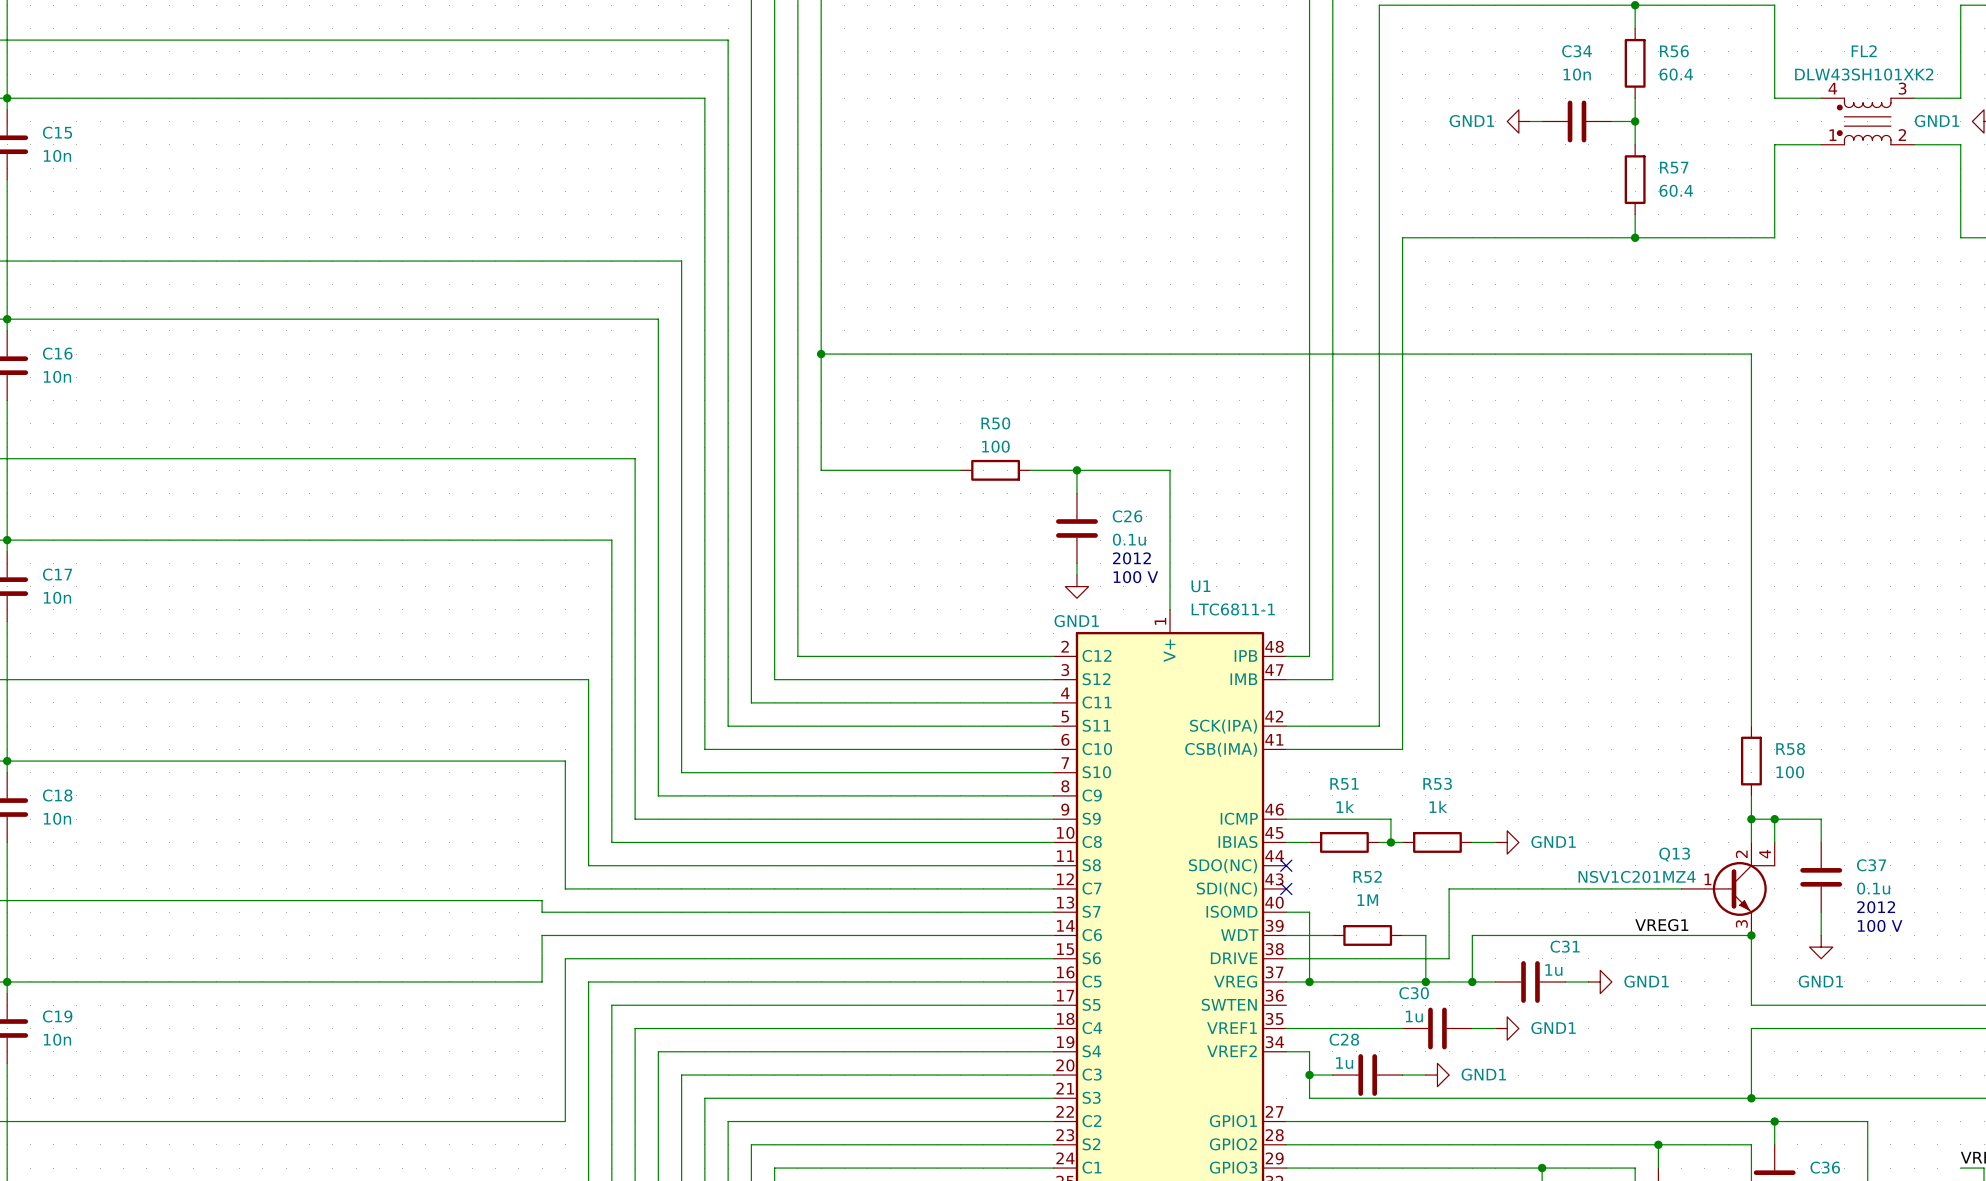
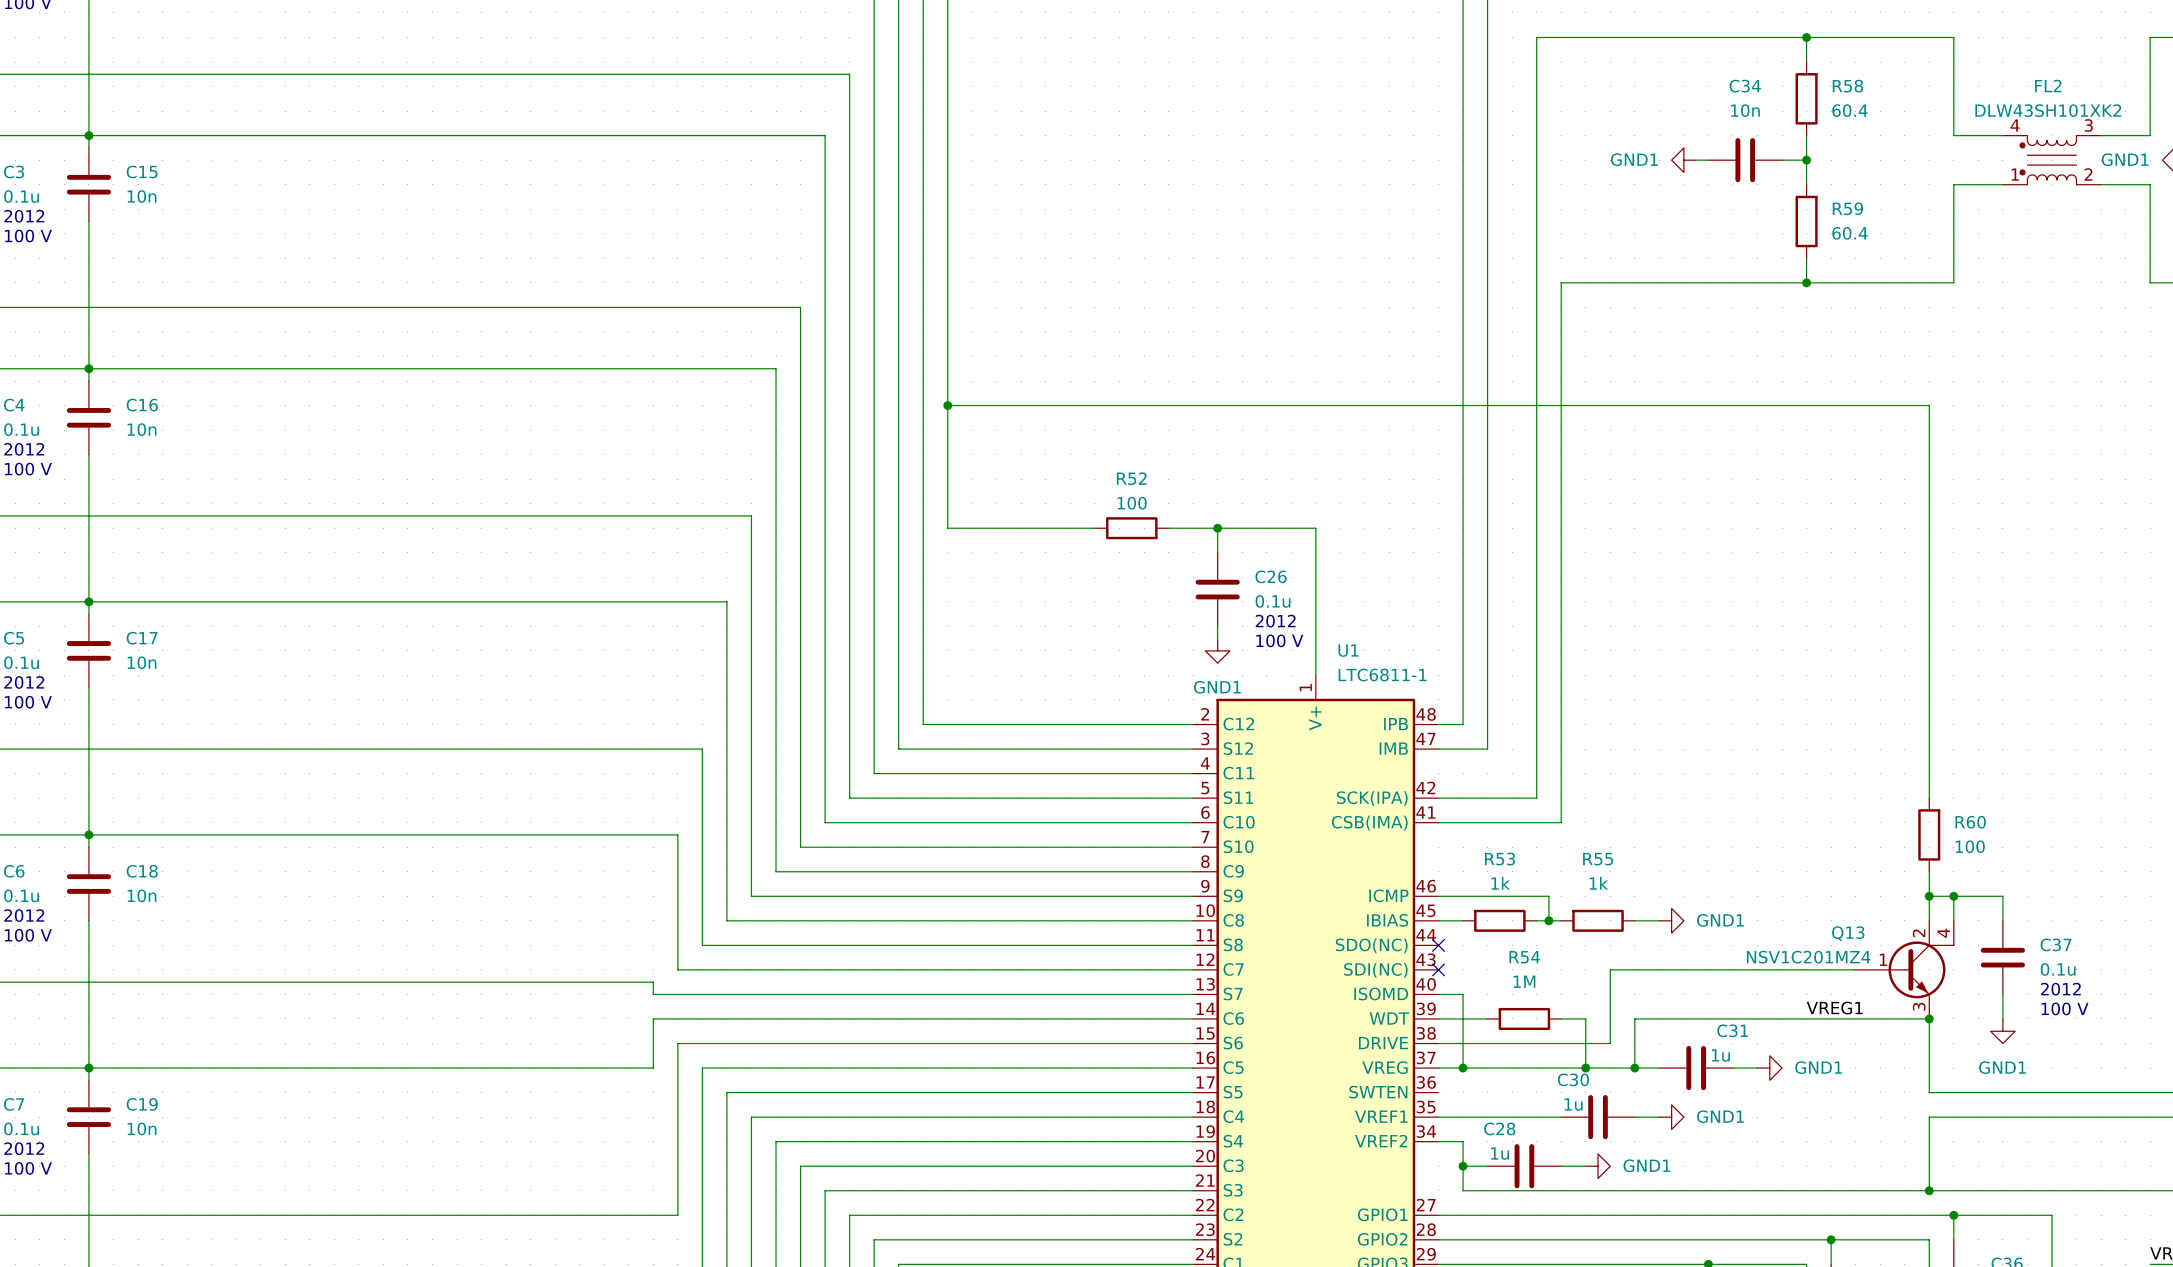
R56 name: R56 (1674, 51) -> R58 (1847, 86)
R57 name: R57 (1674, 167) -> R59 (1847, 208)
R50 name: R50 (995, 423) -> R52 (1131, 478)
R58 name: R58 (1790, 748) -> R60 (1970, 822)
R51 name: R51 (1344, 783) -> R53 (1500, 859)
R53 name: R53 (1437, 783) -> R55 (1598, 859)
R52 name: R52 (1367, 876) -> R54 (1524, 957)

